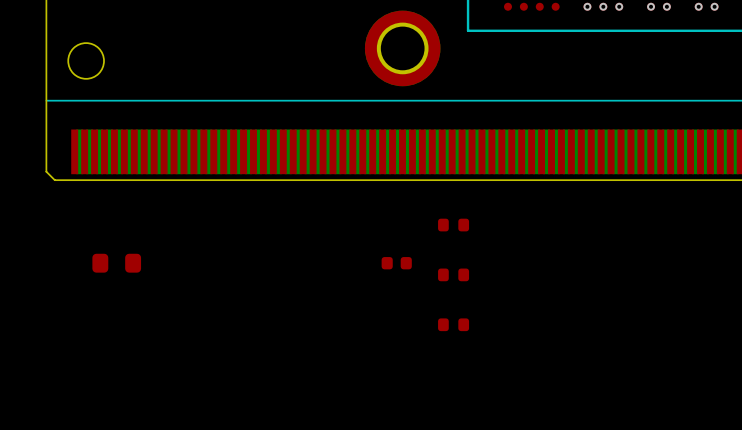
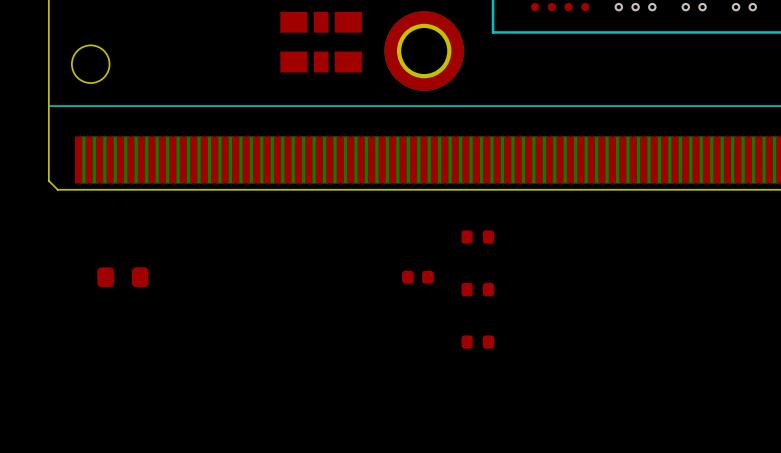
part: none -> (321, 42)

